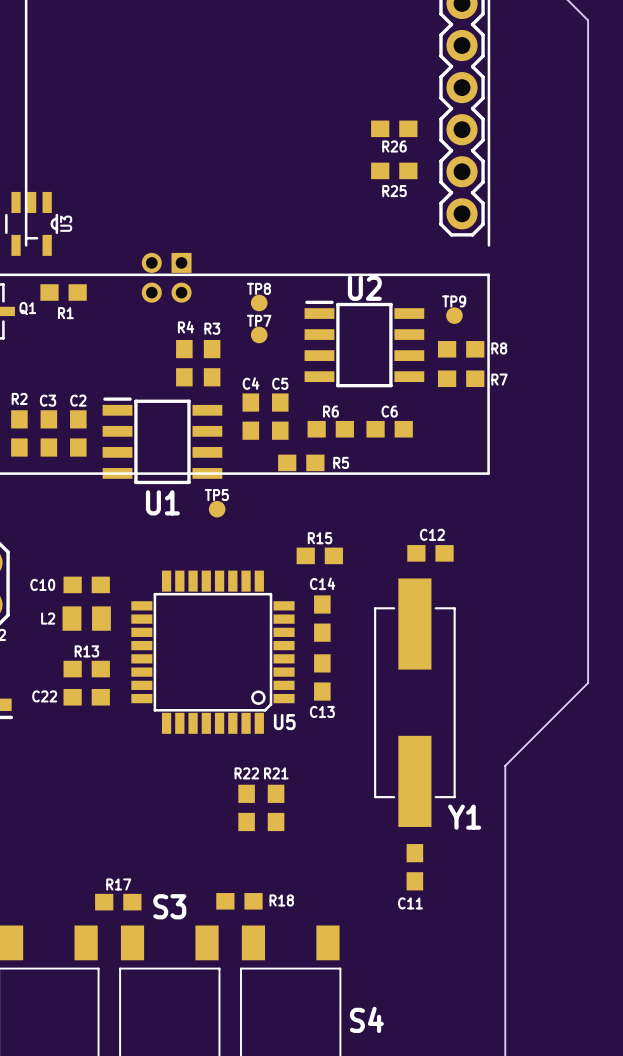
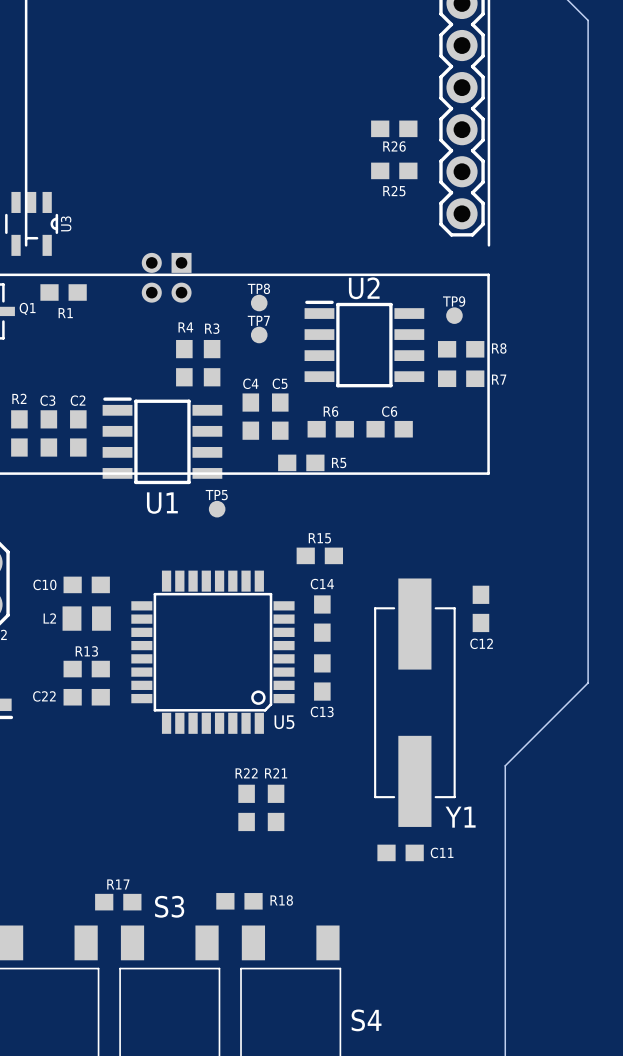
C12 name position: C12 (432, 534) -> C12 (481, 643)
C12 rotation: 0° (430, 553) -> 90° clockwise (480, 608)
C12 position: (430, 553) -> (480, 608)
C11 rotation: 0° (414, 867) -> 90° clockwise (400, 852)
C11 name position: C11 (410, 903) -> C11 (442, 852)

